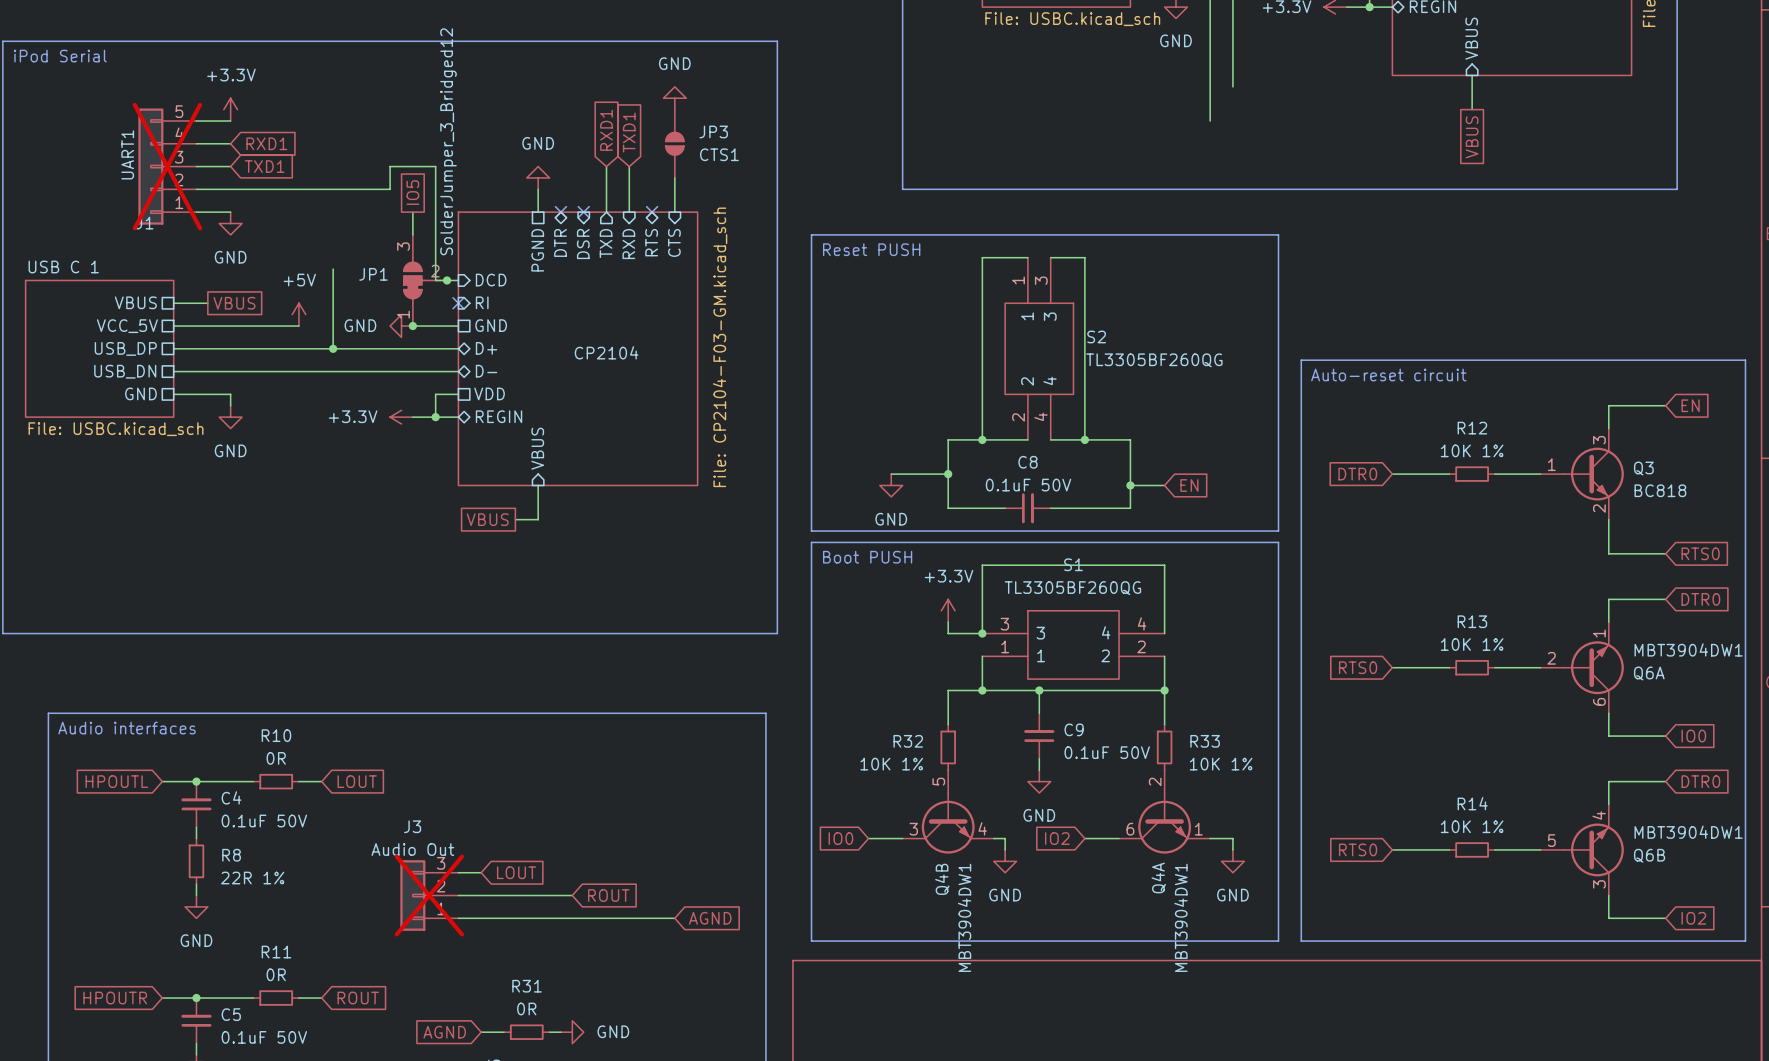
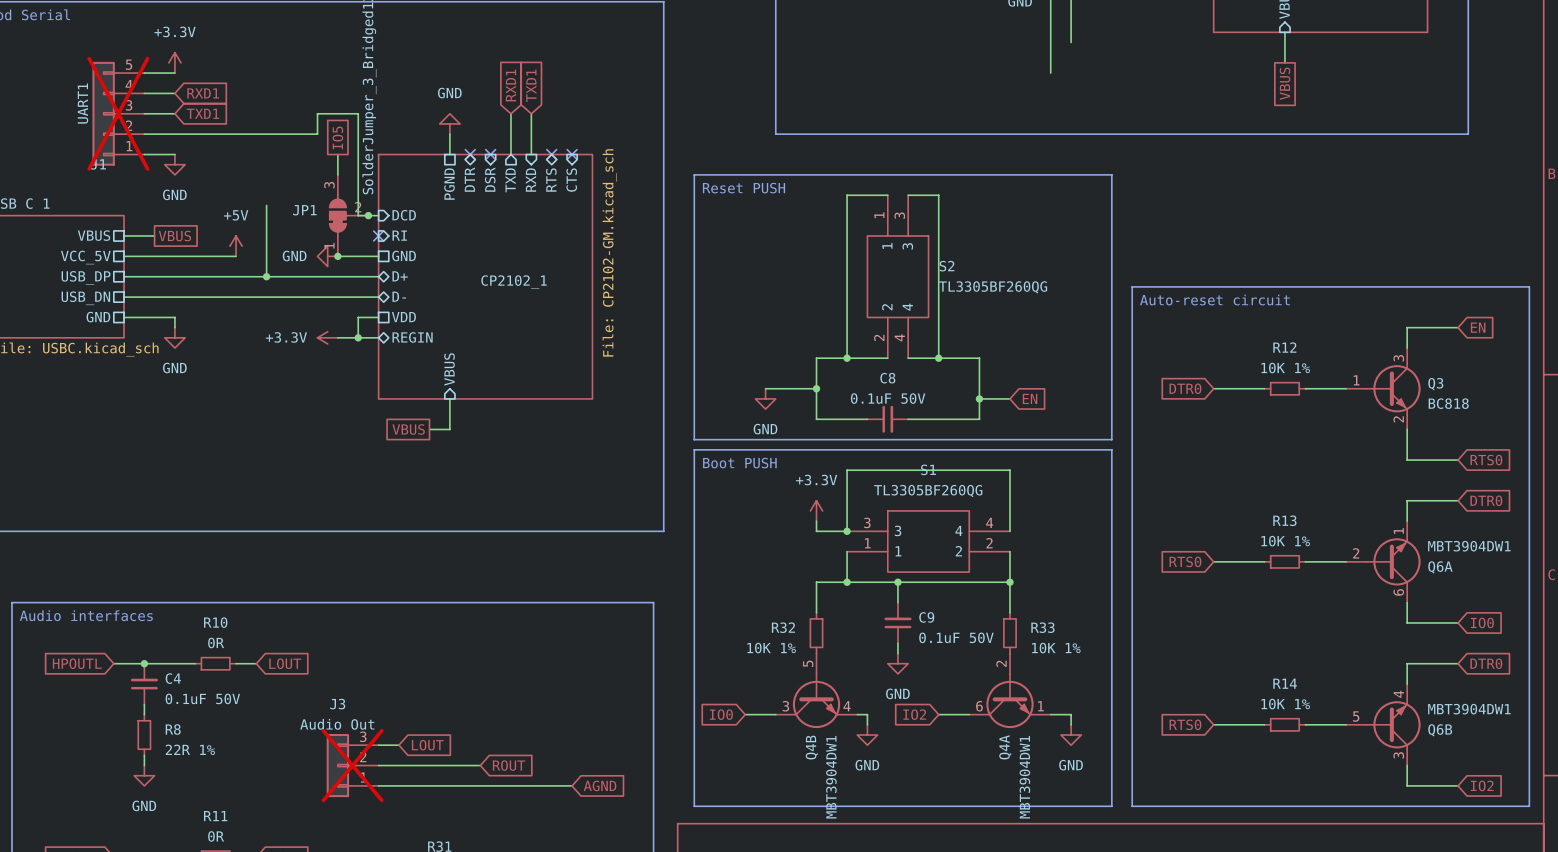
power symbol: GND (674, 98) -> none
JP3: CTS1 (674, 143) -> none
wire: (674, 177) (674, 212) -> none
no-connect mark: none -> (572, 154)
sheet CP2104 value: File: CP2104-F03-GM.kicad_sch (720, 347) -> File: CP2102-GM.kicad_sch (609, 252)
sheet CP2104 name: CP2104 (606, 352) -> CP2102_1 (514, 282)

